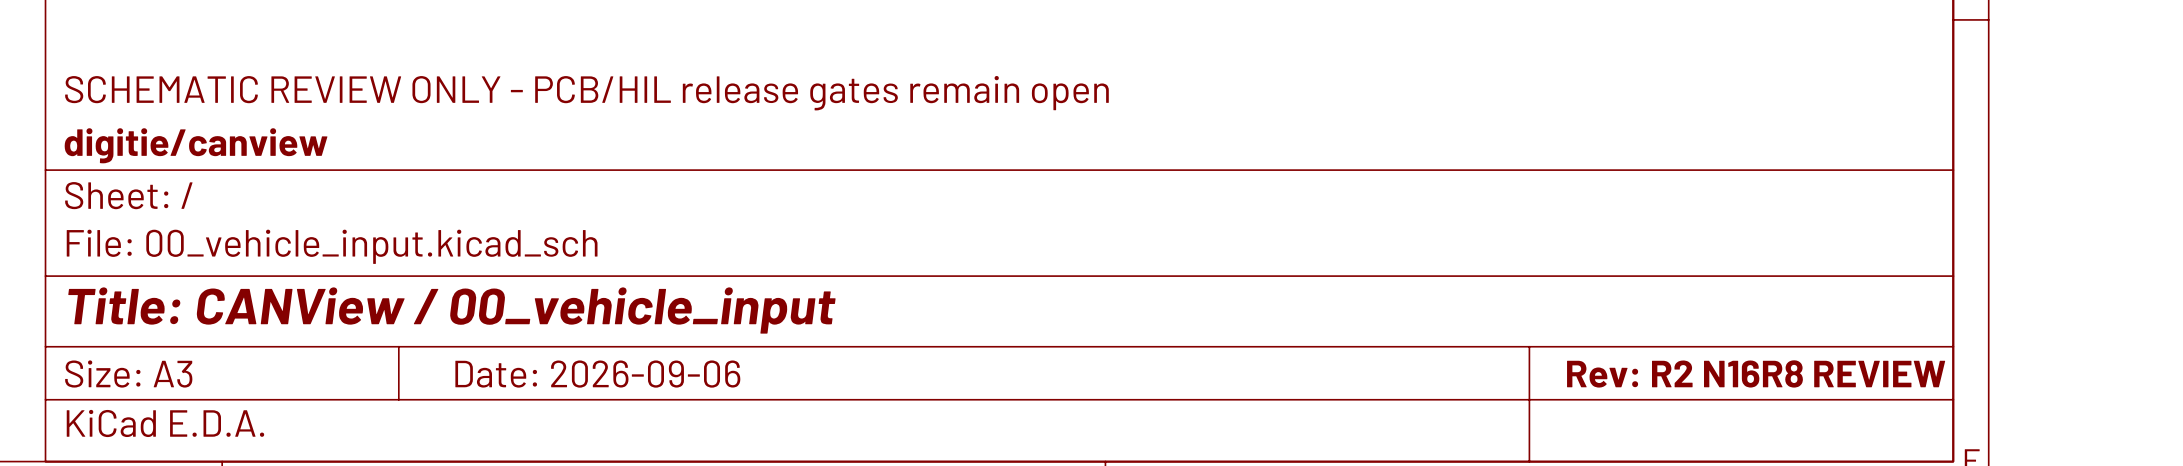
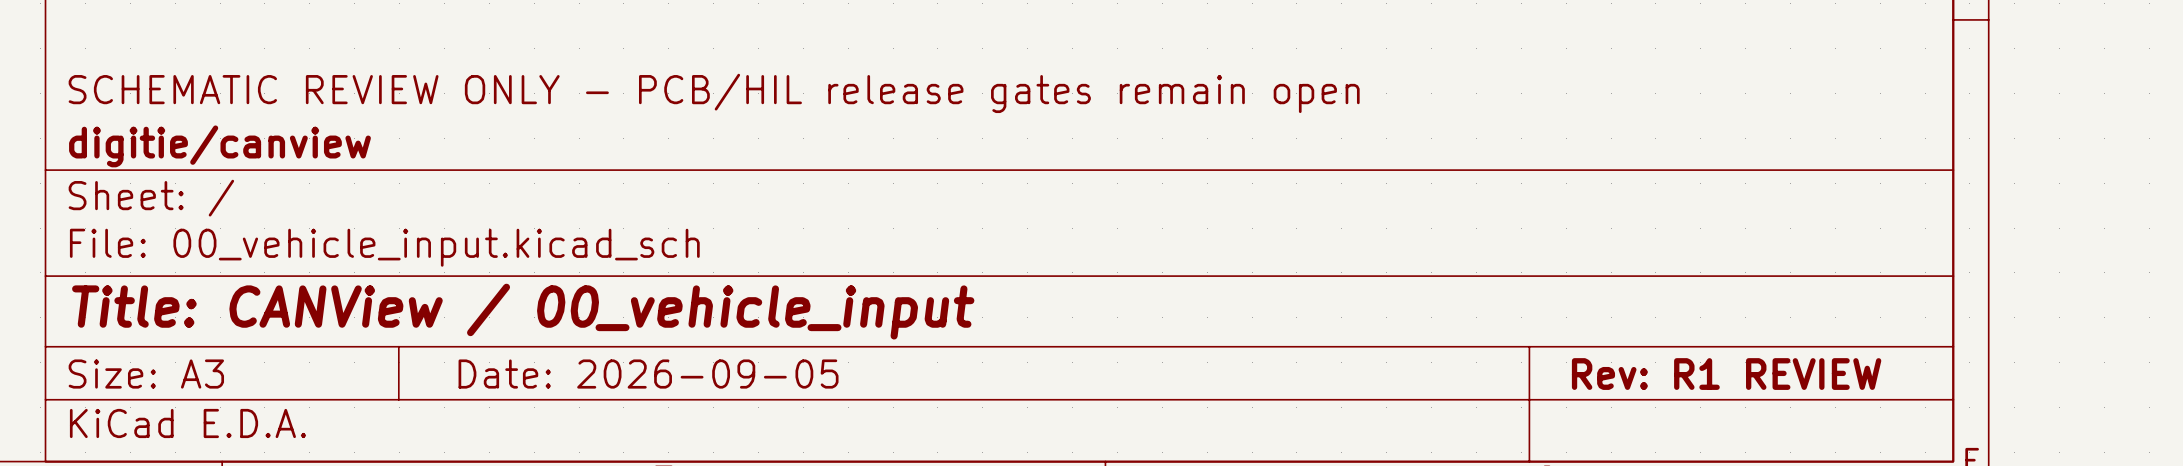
title block: Rev: R2 N16R8 REVIEW (1756, 373) -> Rev: R1 REVIEW (1726, 374)
title block: Date: 2026-09-06 (597, 374) -> Date: 2026-09-05 (648, 374)

